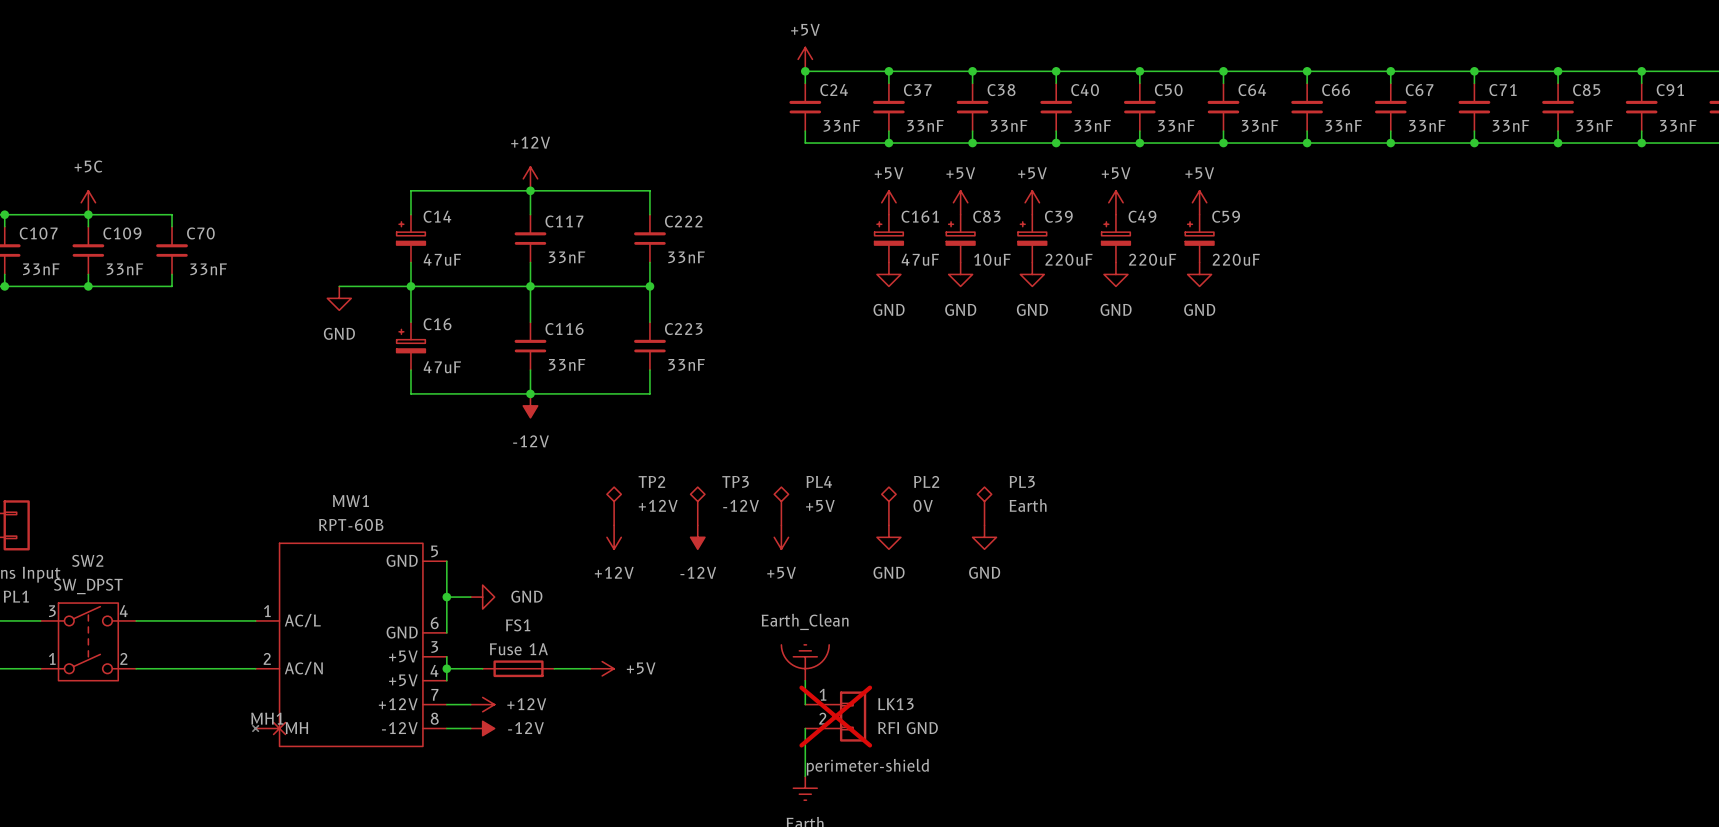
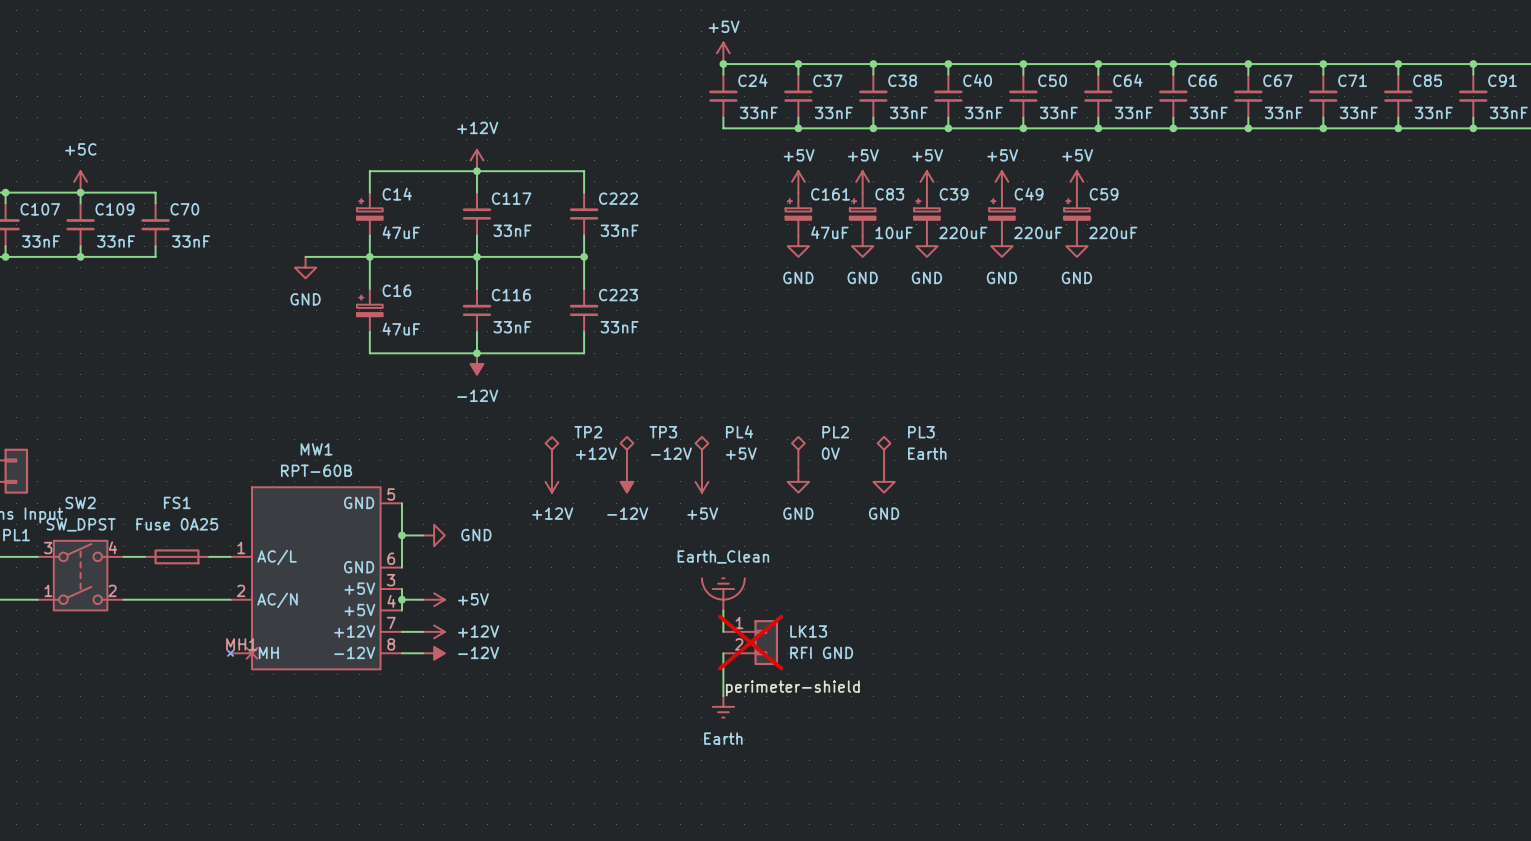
FS1 name position: FS1 (518, 625) -> FS1 (177, 502)
FS1 value: Fuse 1A (518, 649) -> Fuse 0A25 (177, 524)
FS1 position: (518, 668) -> (177, 556)
wire: (554, 668) (590, 668) -> none
power symbol position: +5V (602, 668) -> +5V (434, 599)

